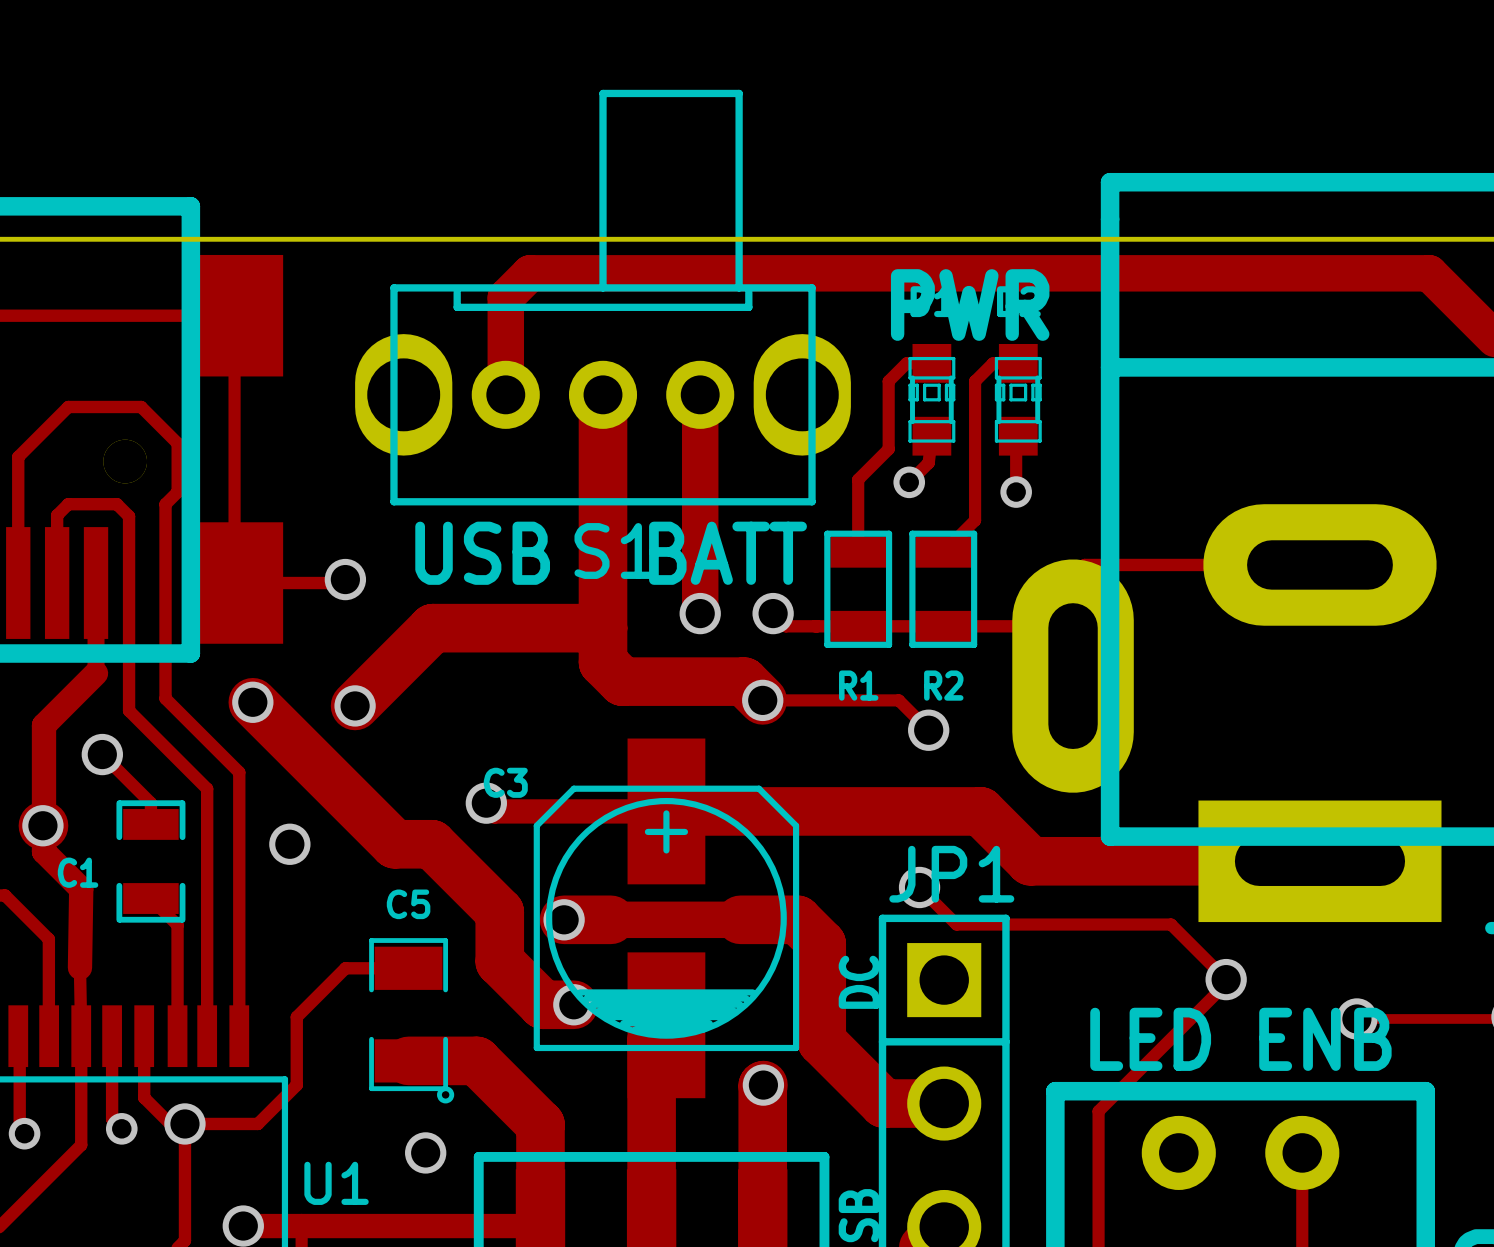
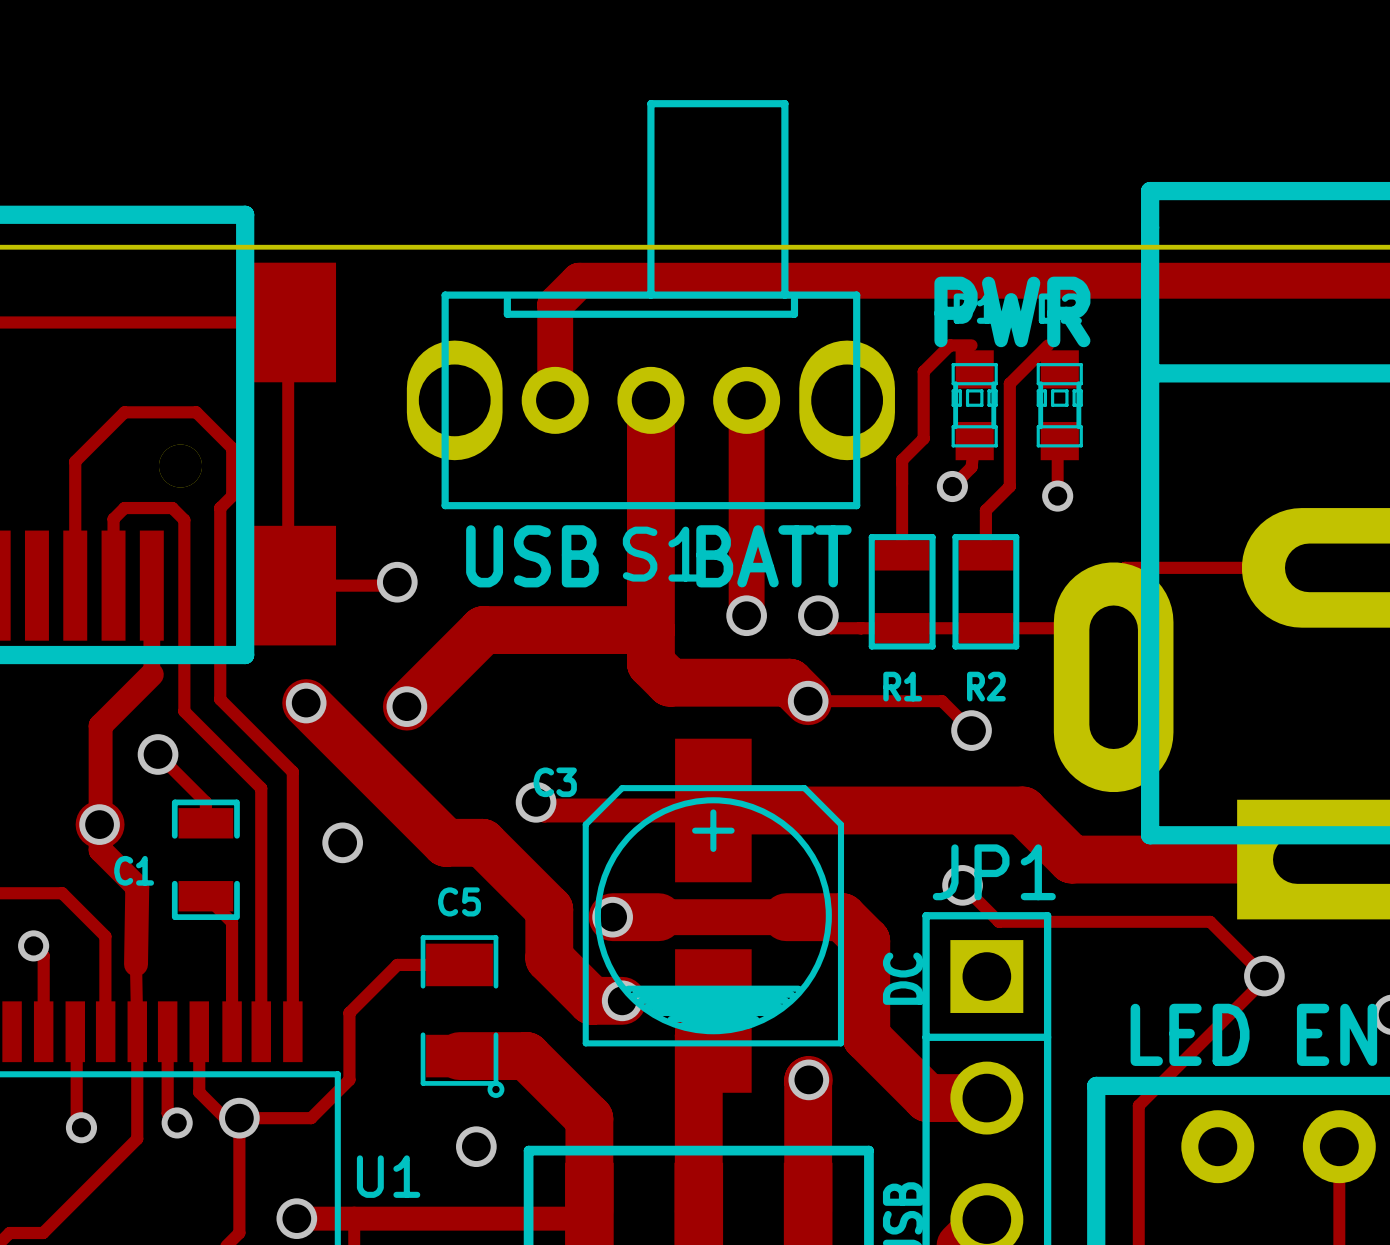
track: (931, 363) (906, 363) (888, 381) (888, 449) (858, 479) -> (971, 345) (949, 345) (923, 371) (923, 438) (902, 460) (902, 483)
track: (1018, 363) (993, 363) (975, 381) (975, 520) (943, 552) -> (1048, 345) (1009, 383) (1009, 486) (985, 510) (985, 555)

